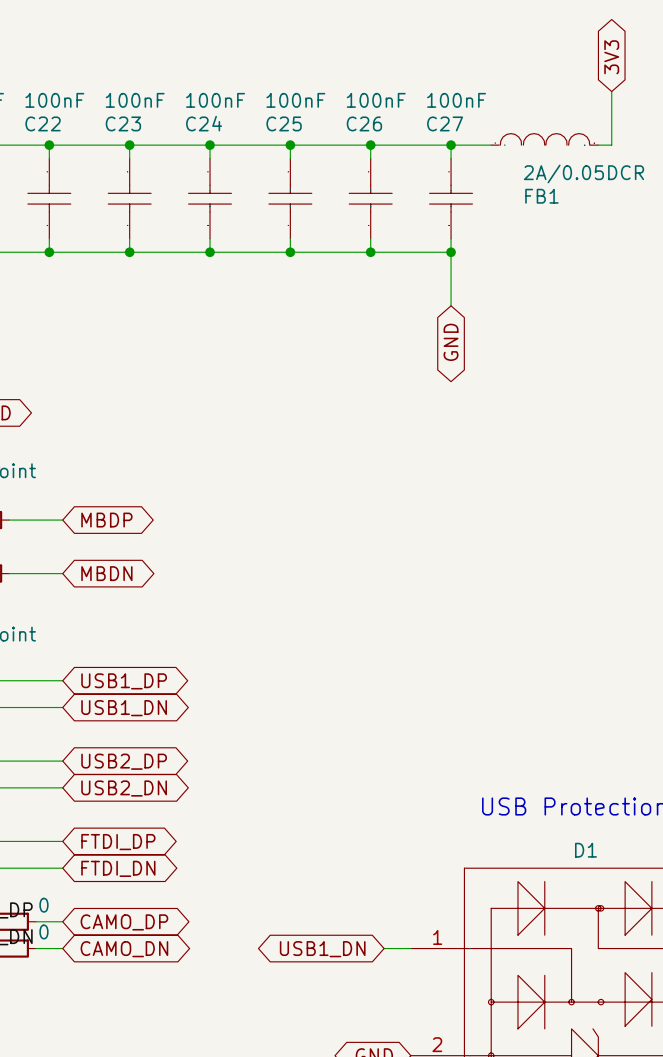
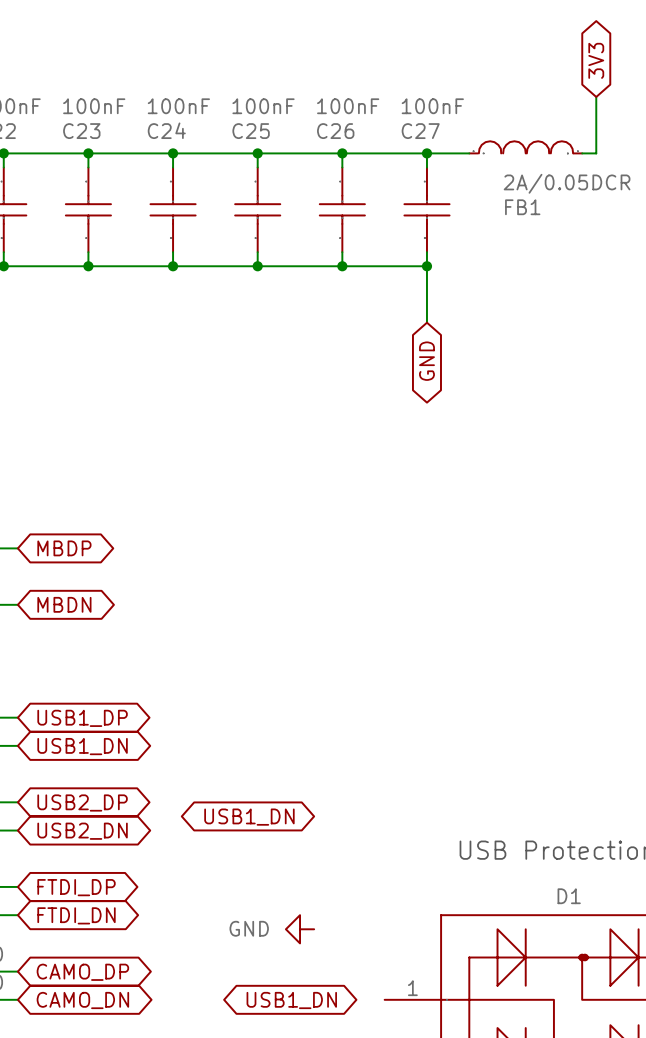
global label: none -> USB1_DN (249, 817)
power symbol: none -> GND (300, 929)
wire: (384, 948) (410, 948) -> none

